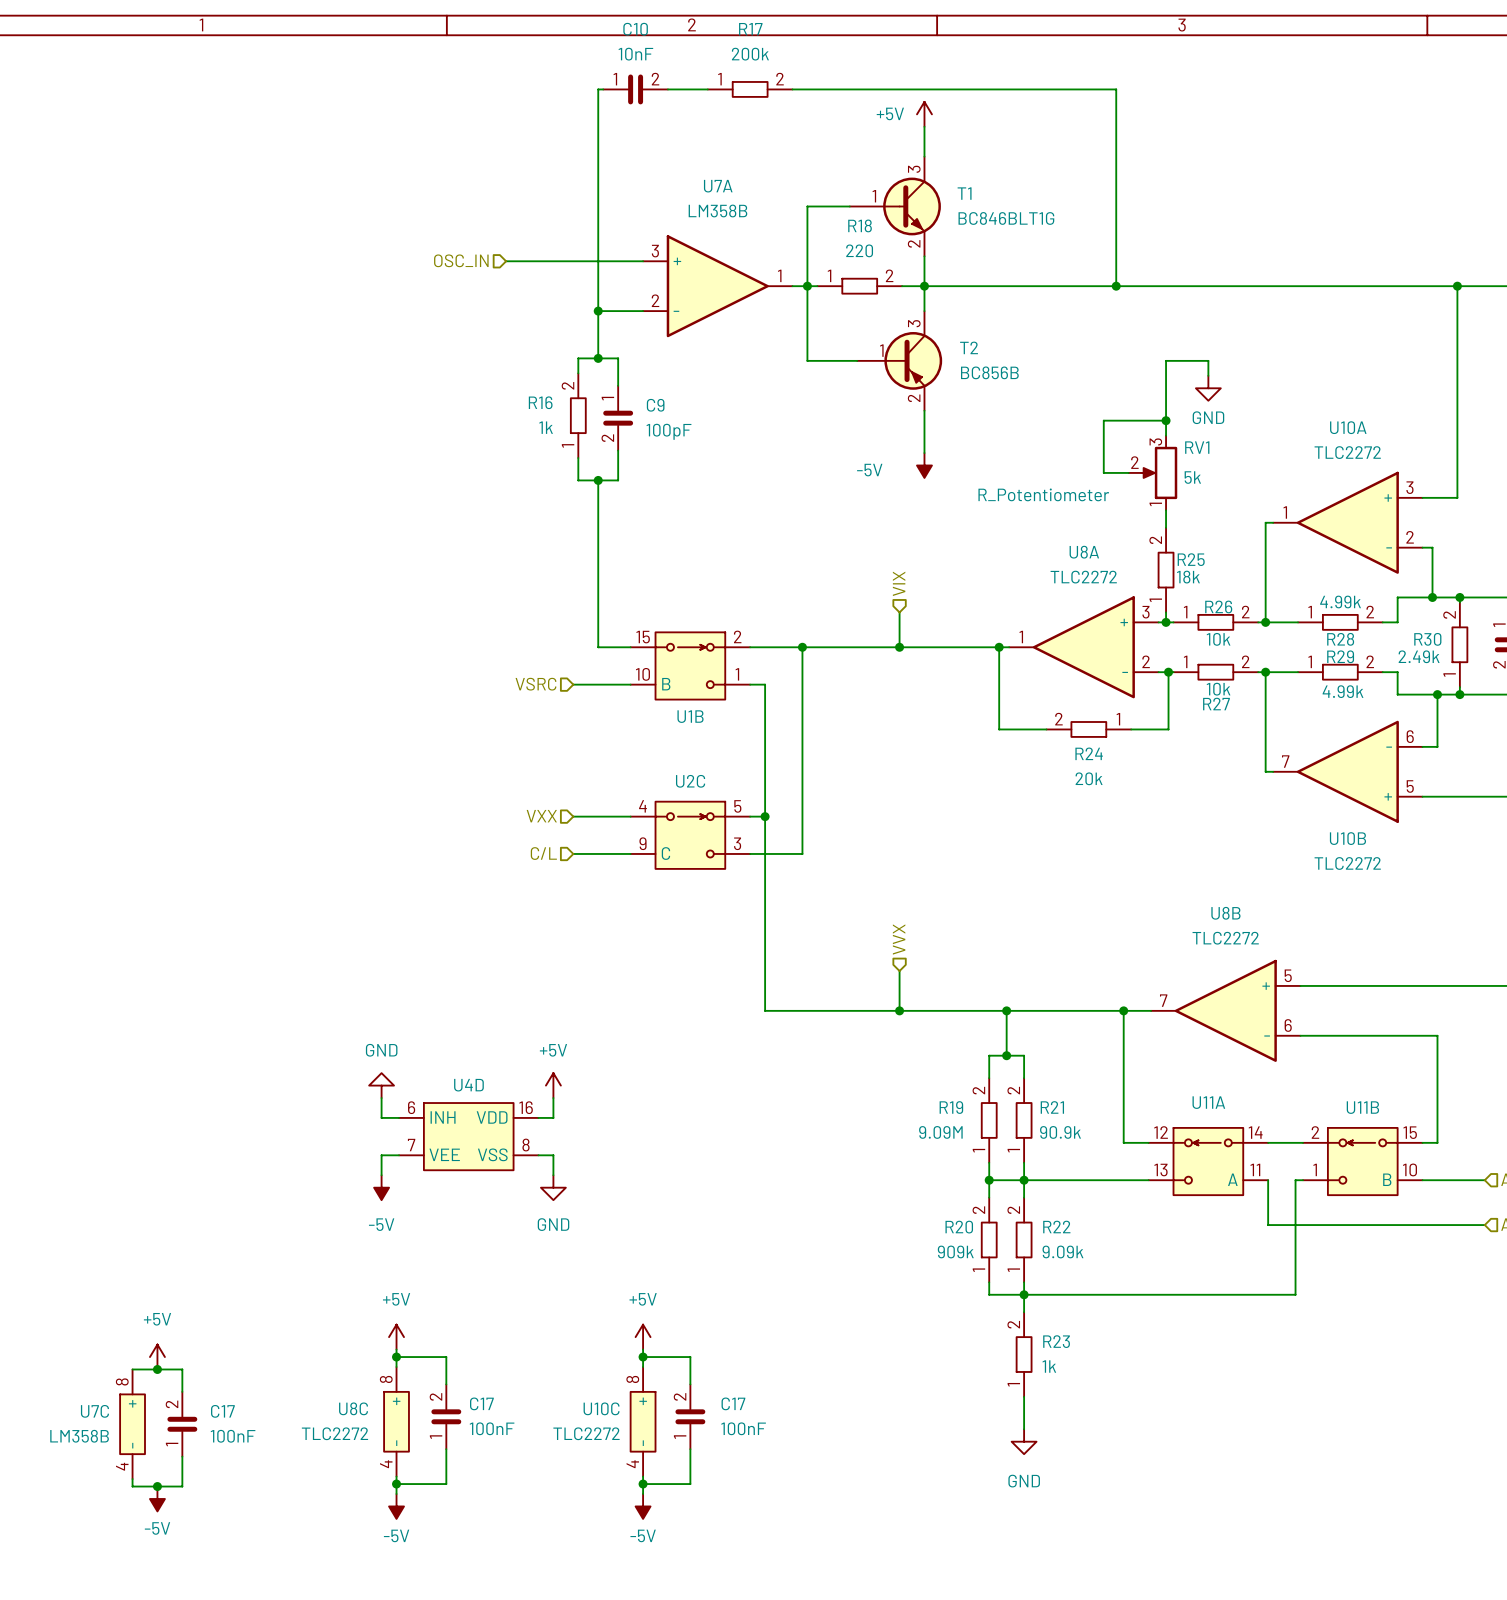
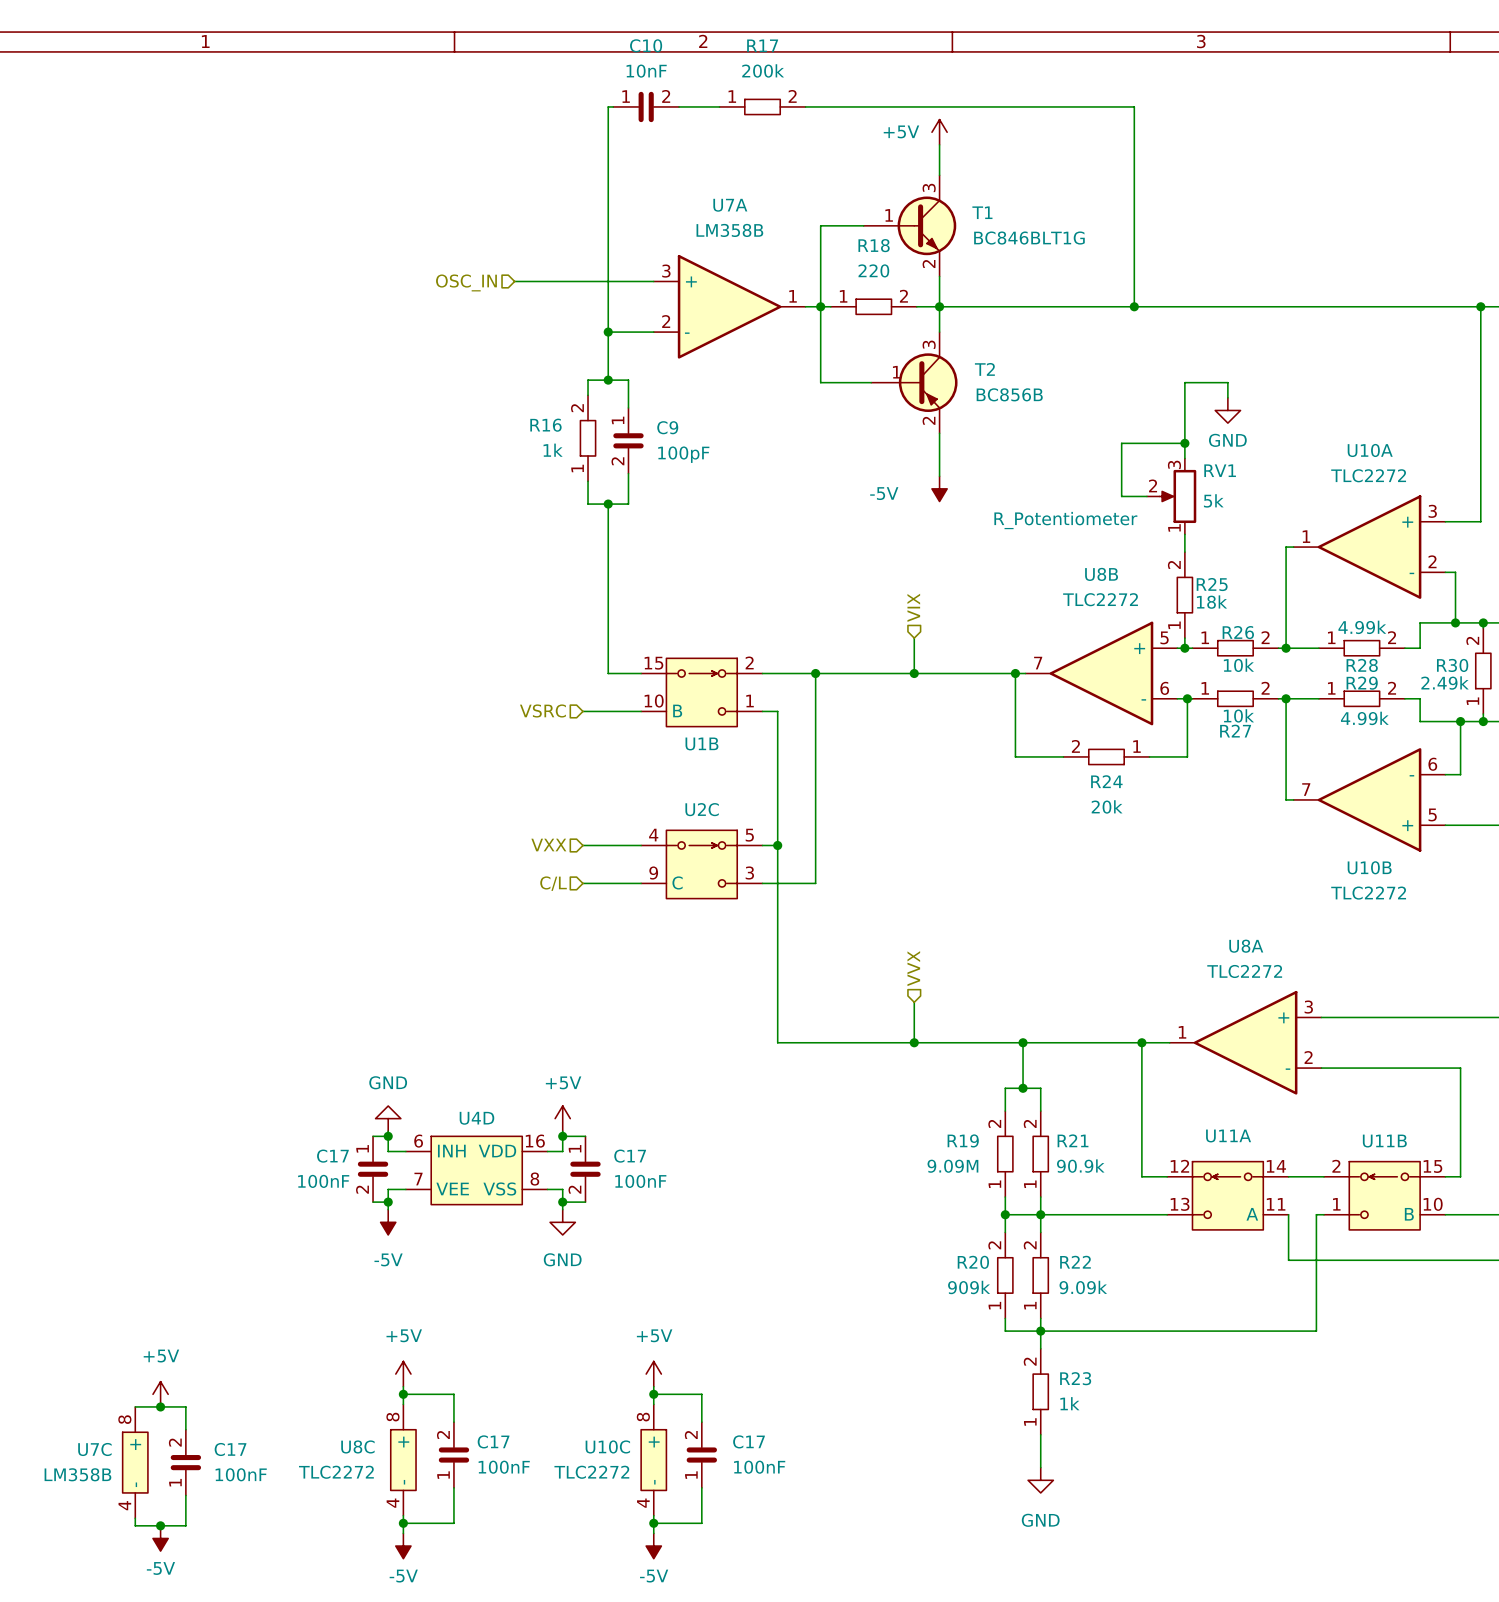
U8A position: (1083, 647) -> (1245, 1042)
U8B position: (1225, 1010) -> (1101, 673)
wire: none -> (373, 1136) (388, 1136)
junction: none -> (388, 1136)
wire: none -> (562, 1136) (585, 1136)
junction: none -> (562, 1136)
C17: none -> (373, 1169)
C17: none -> (585, 1169)
wire: none -> (373, 1202) (388, 1202)
junction: none -> (388, 1202)
wire: none -> (562, 1202) (585, 1202)
junction: none -> (562, 1202)

